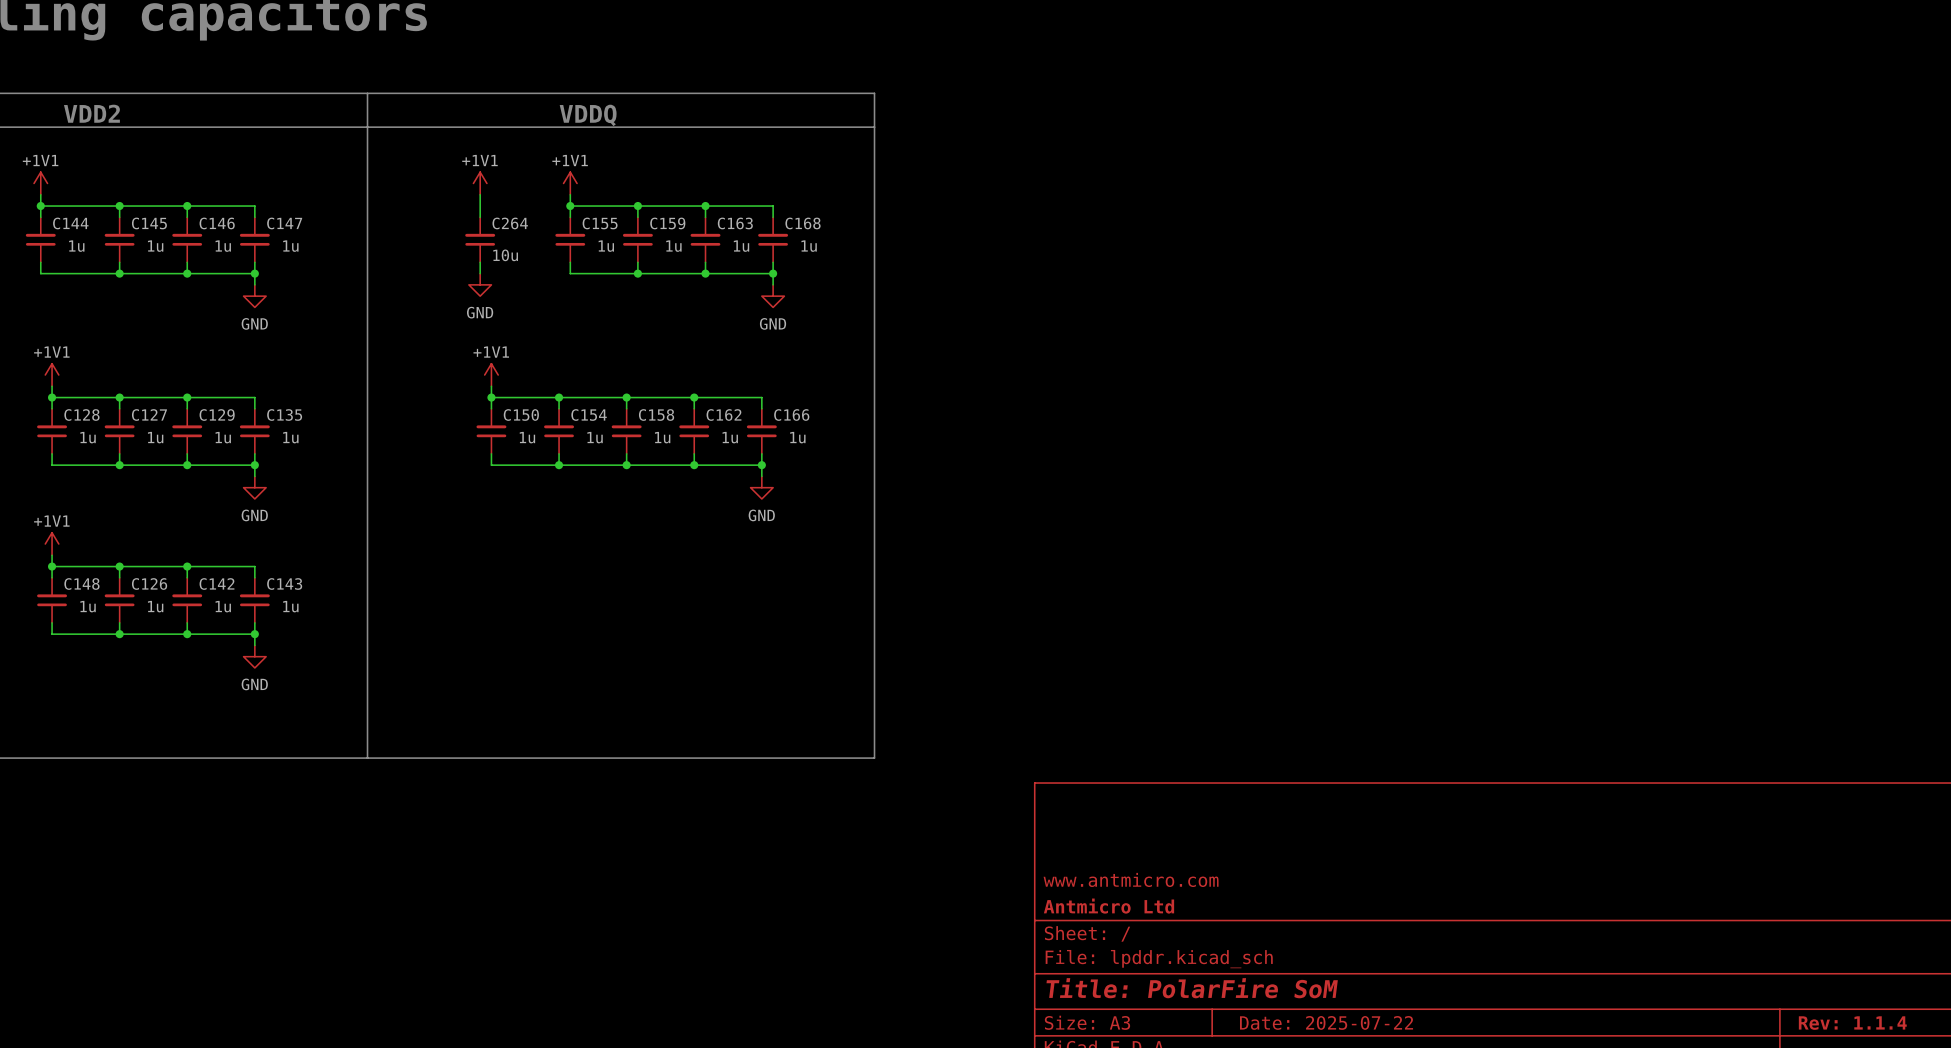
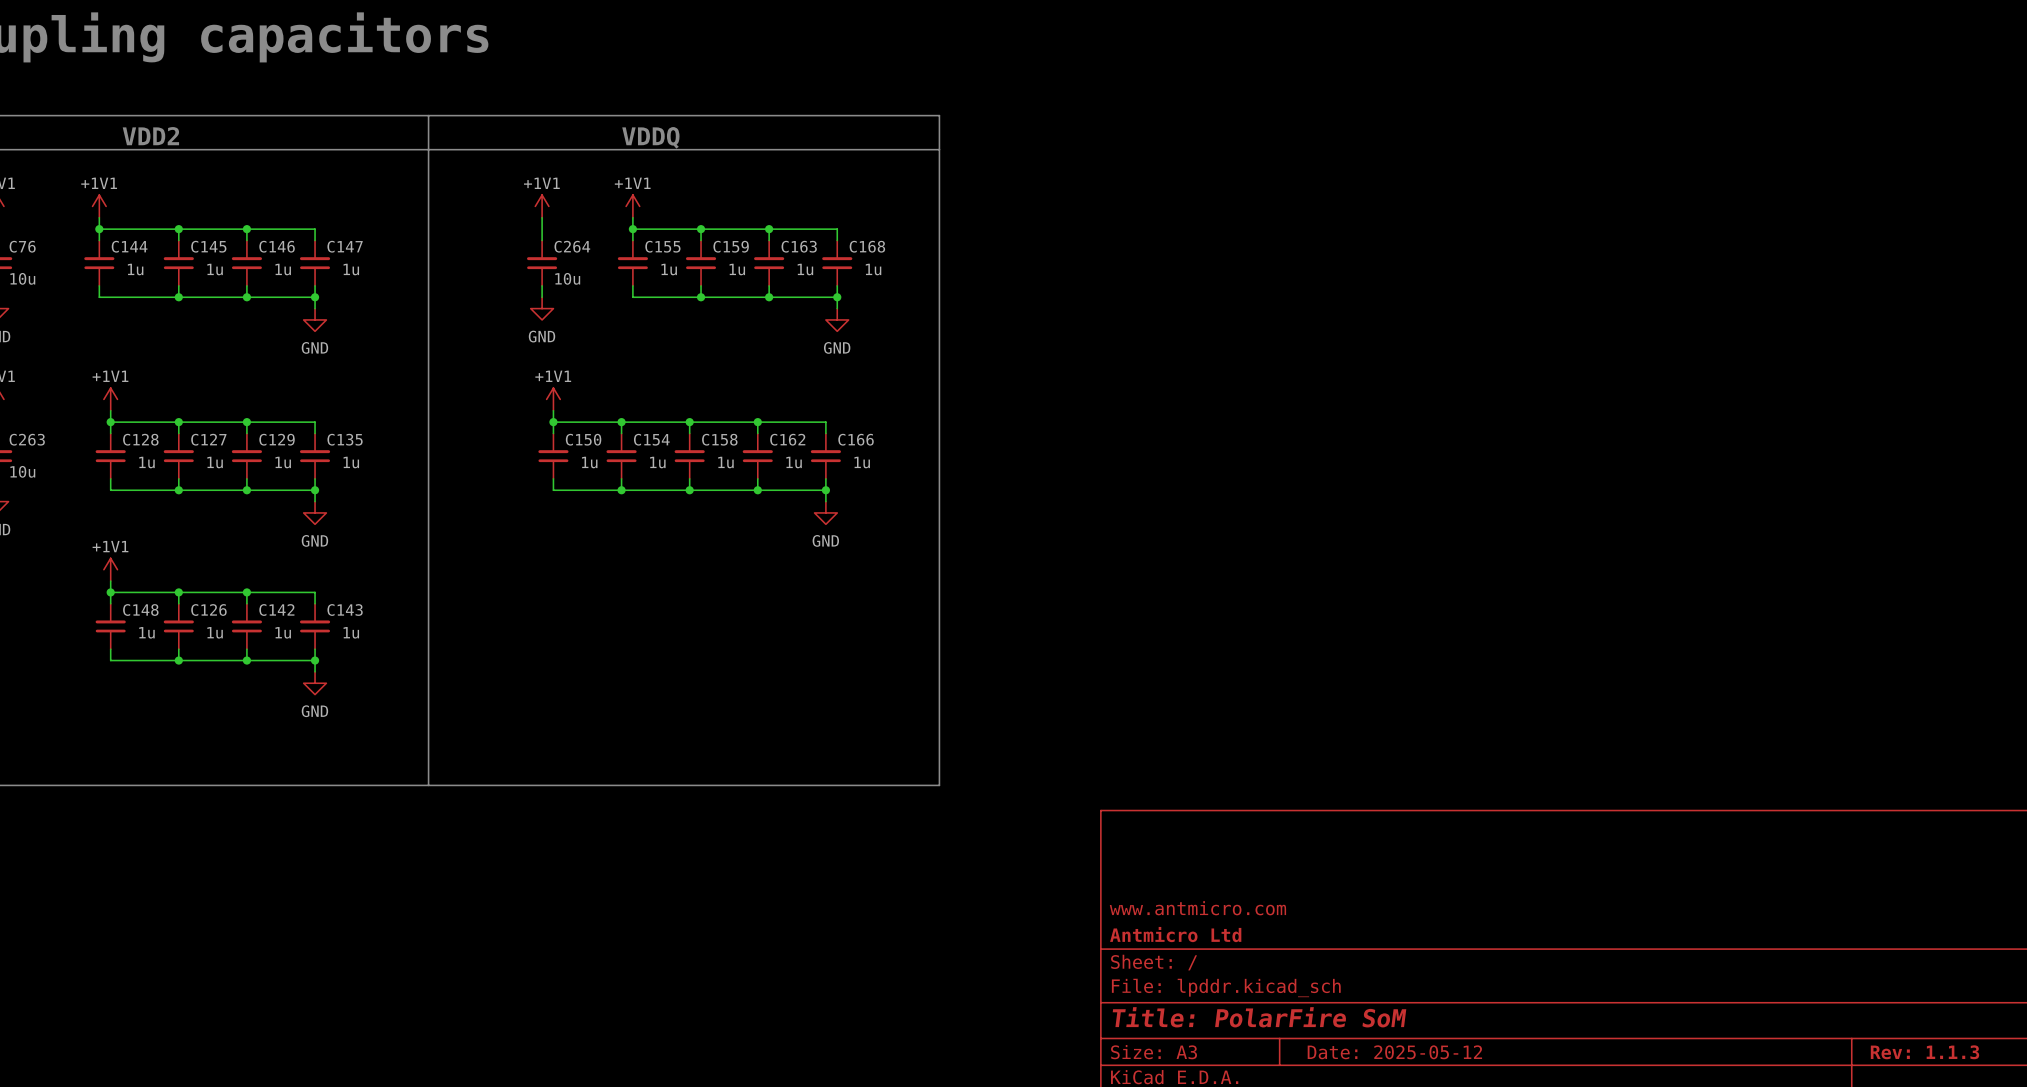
title block: Date: 2025-07-22 (1326, 1022) -> Date: 2025-05-12 (1394, 1052)
title block: Rev: 1.1.4 (1852, 1023) -> Rev: 1.1.3 (1924, 1052)

